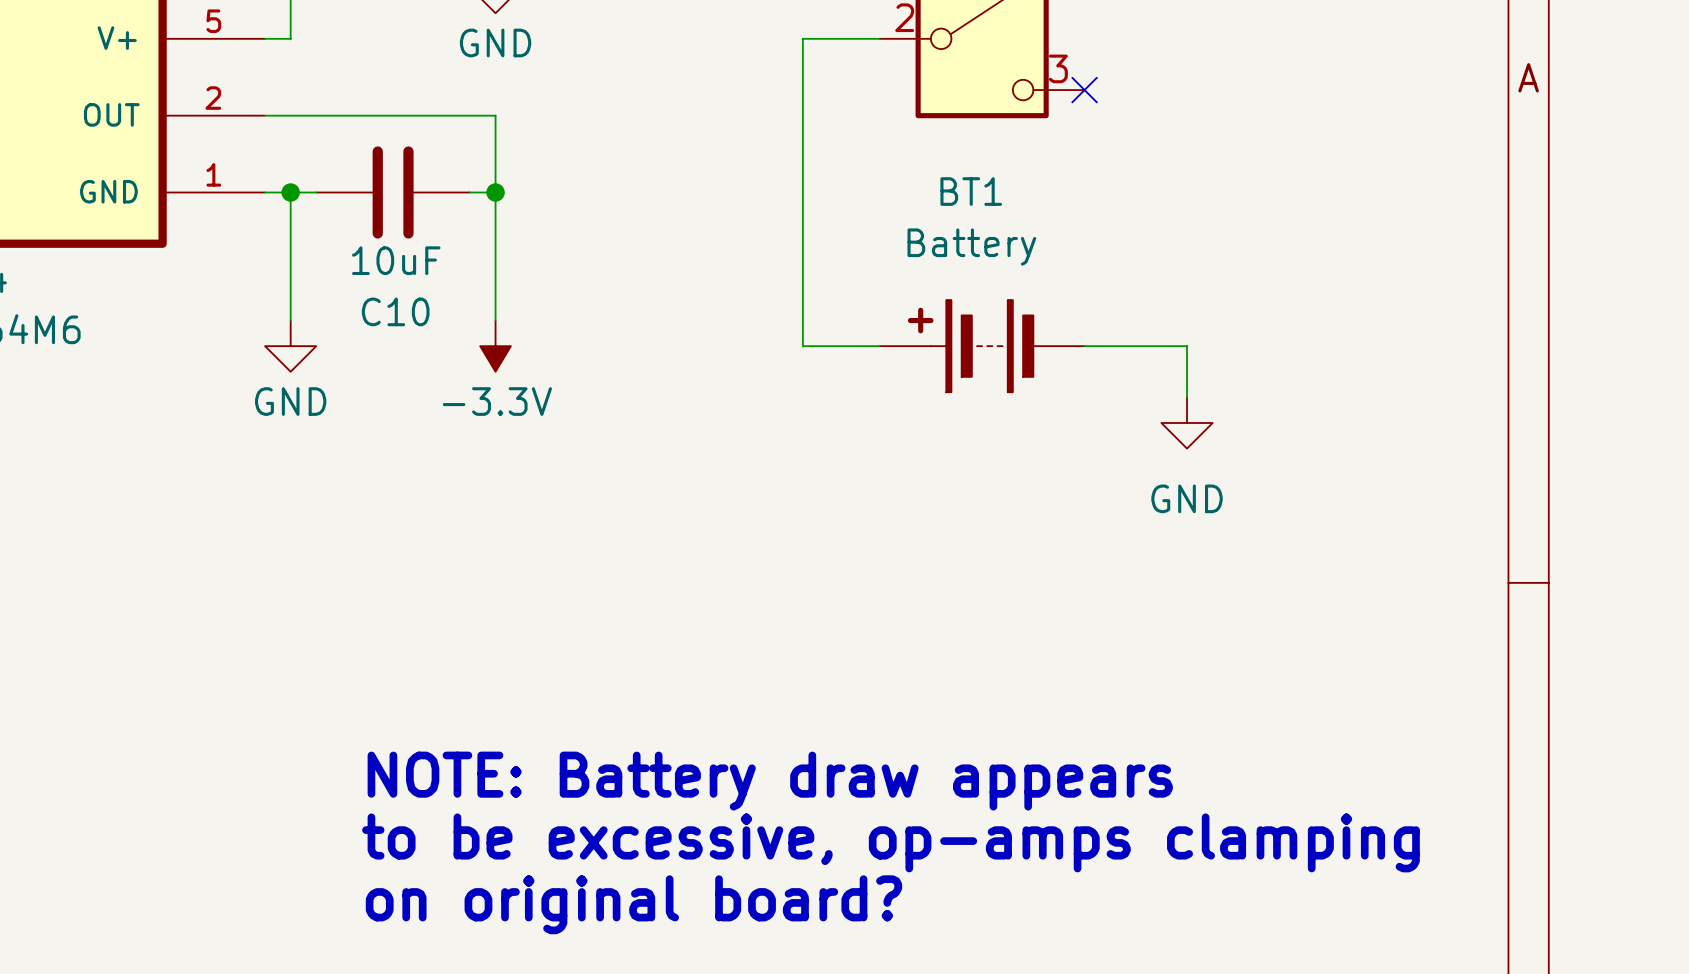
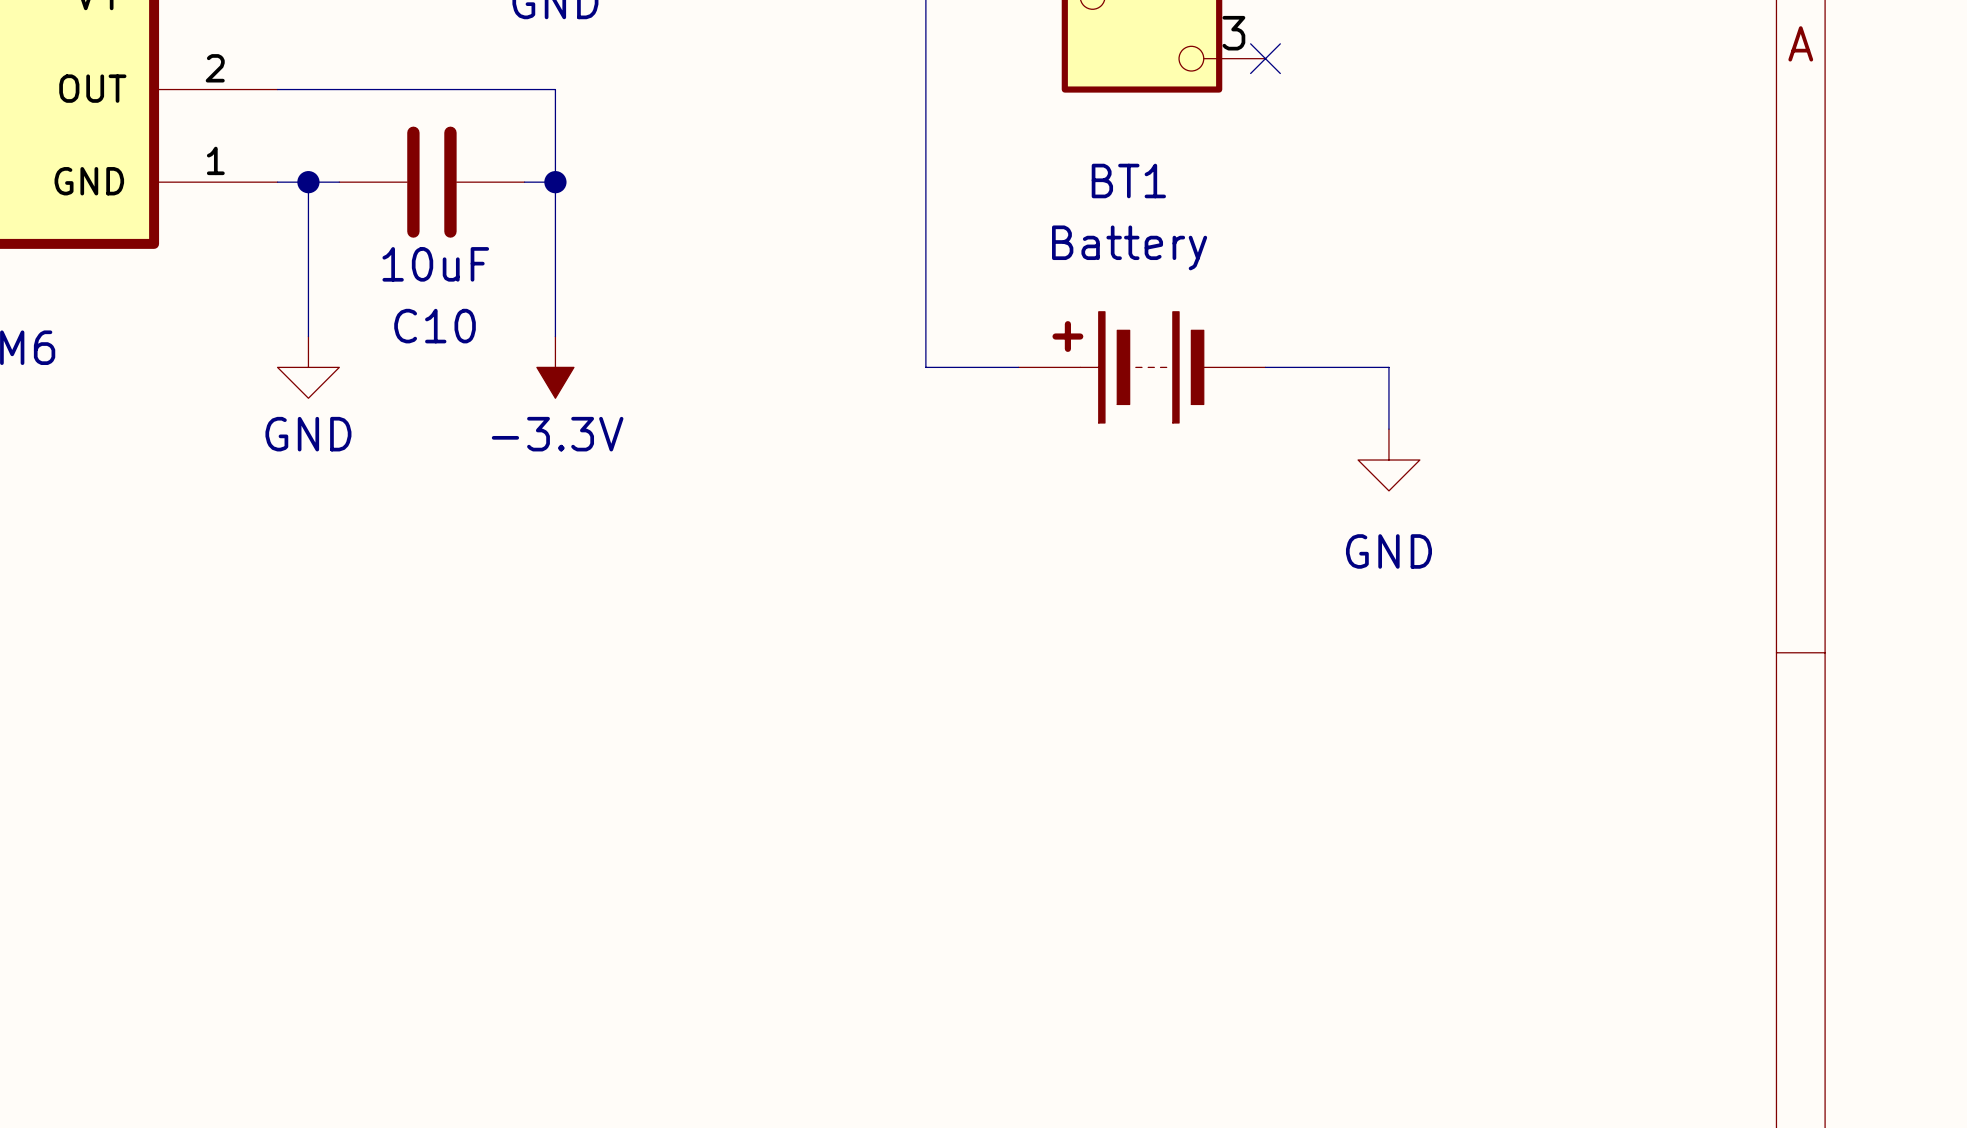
text: NOTE: Battery draw appears (770, 781) -> none
text: to be excessive, op-amps clamping (890, 842) -> none
text: on original board? (633, 904) -> none

